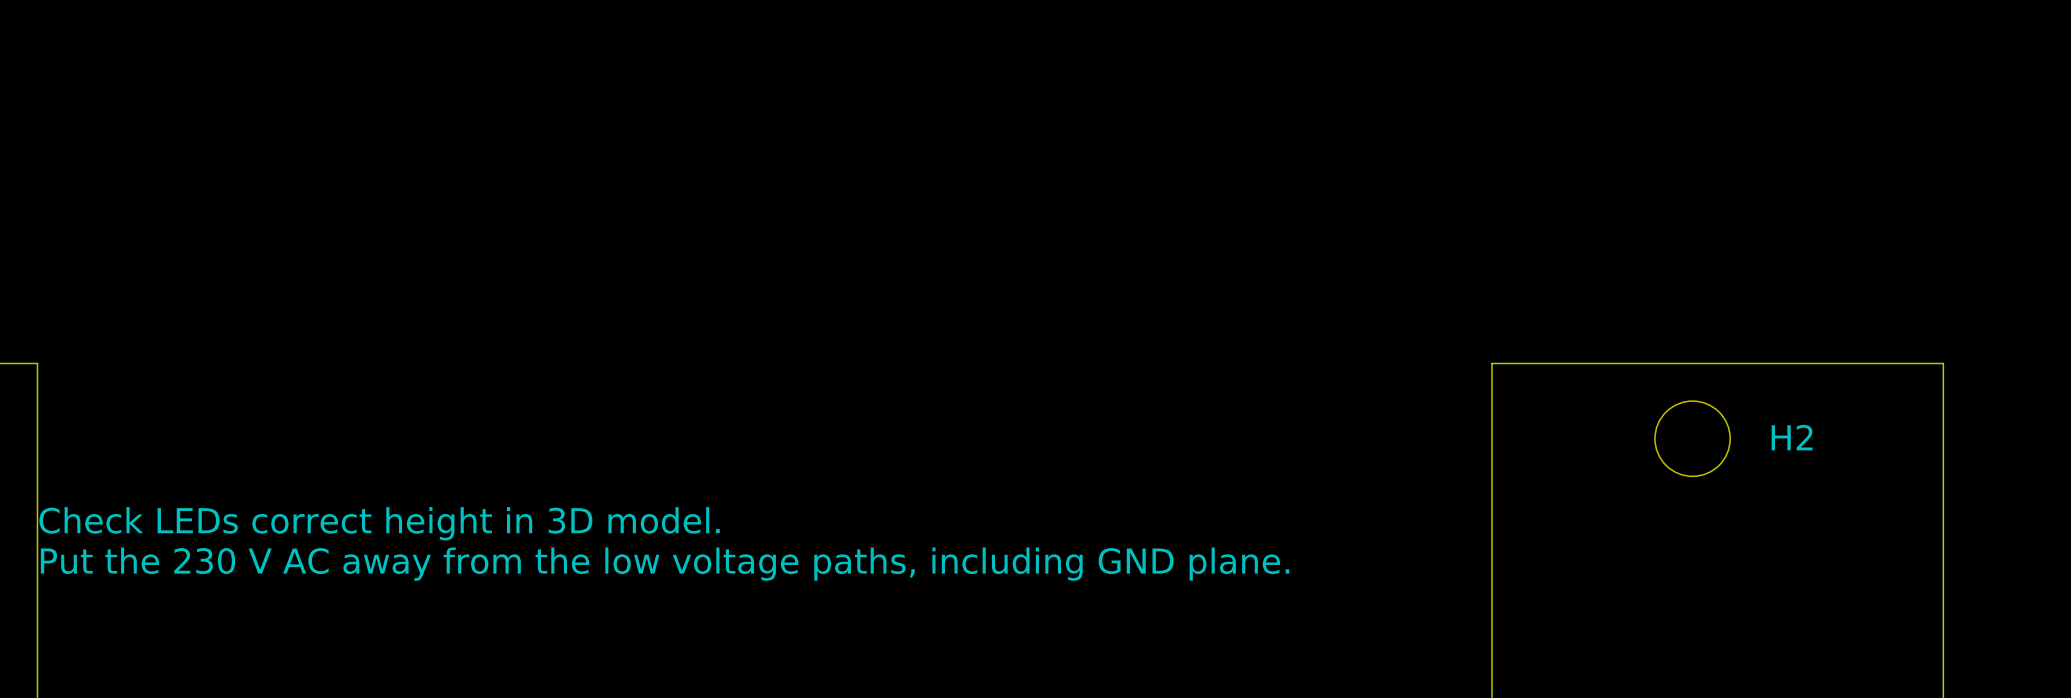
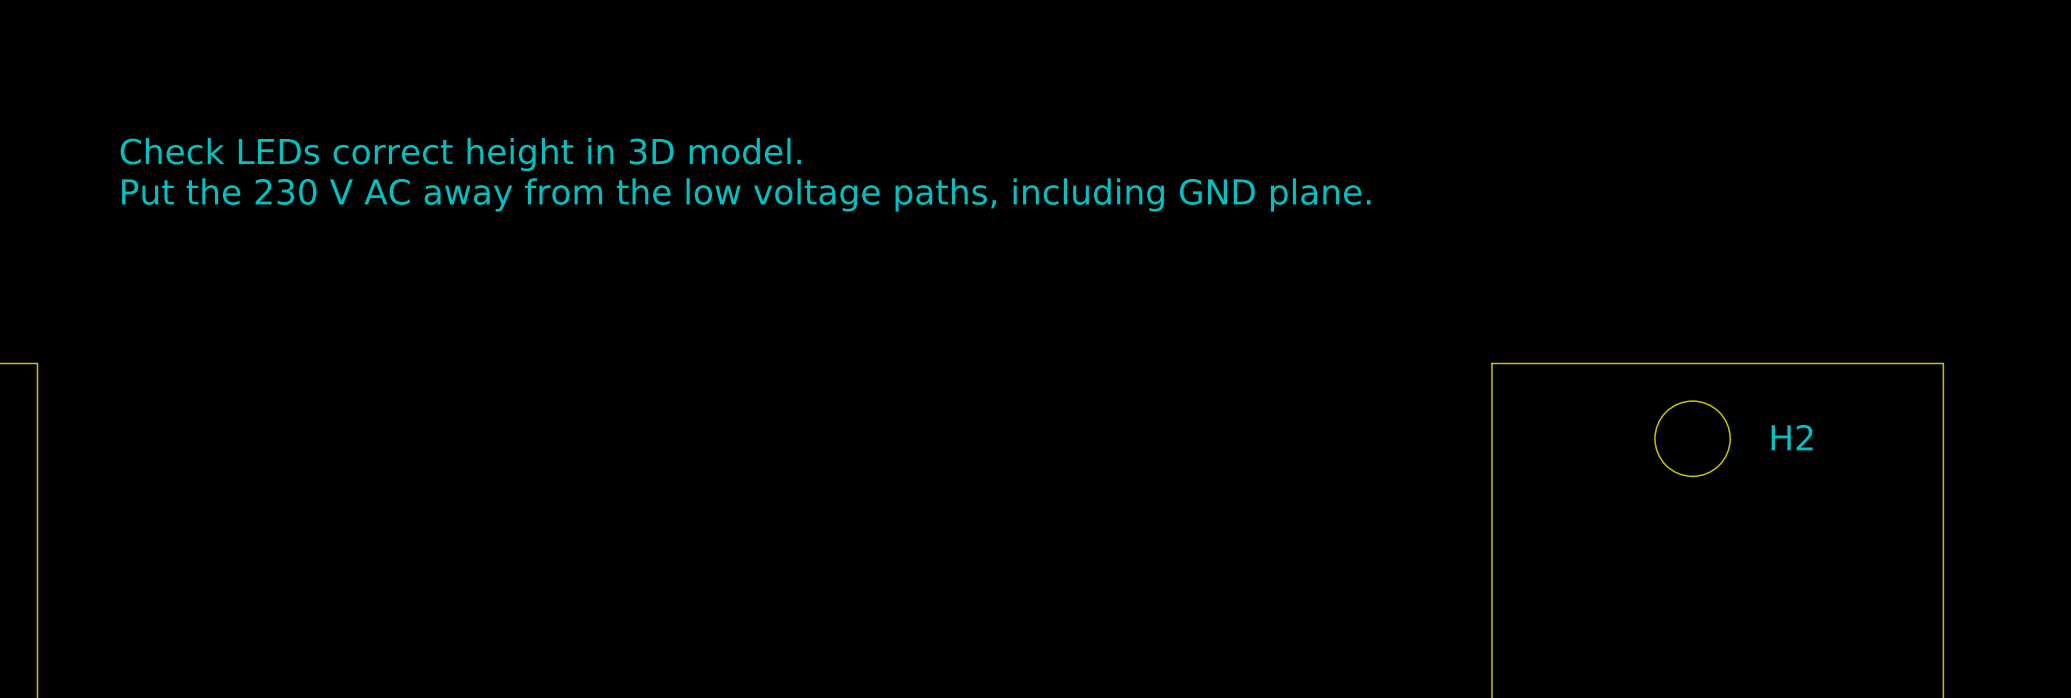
text position: Check LEDs correct height in 3D model. (379, 523) -> Check LEDs correct height in 3D model. (460, 154)
text position: Put the 230 V AC away from the low voltage paths, including GND plane. (665, 564) -> Put the 230 V AC away from the low voltage paths, including GND plane. (746, 194)

